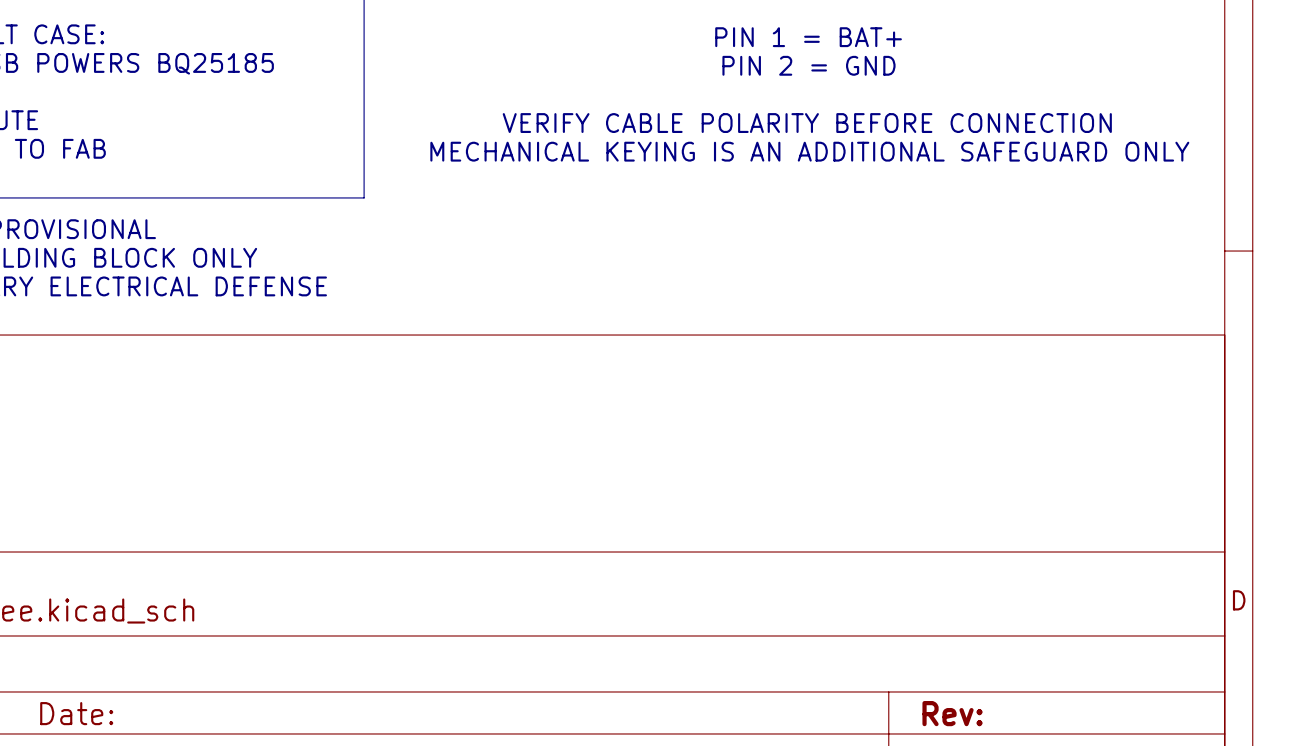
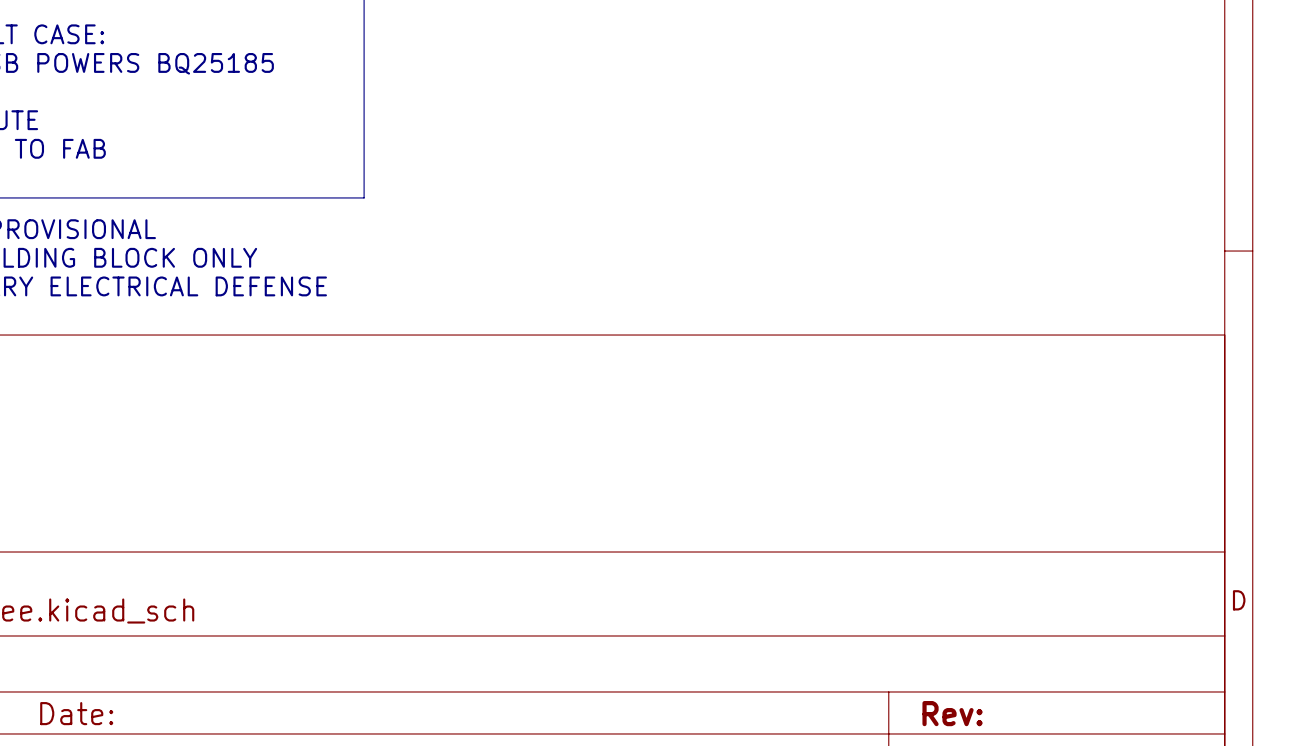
text: PIN 1 = BAT+ (808, 37) -> none
text: PIN 2 = GND (808, 65) -> none
text: VERIFY CABLE POLARITY BEFORE CONNECTION (807, 123) -> none
text: MECHANICAL KEYING IS AN ADDITIONAL SAFEGUARD ONLY (809, 151) -> none

